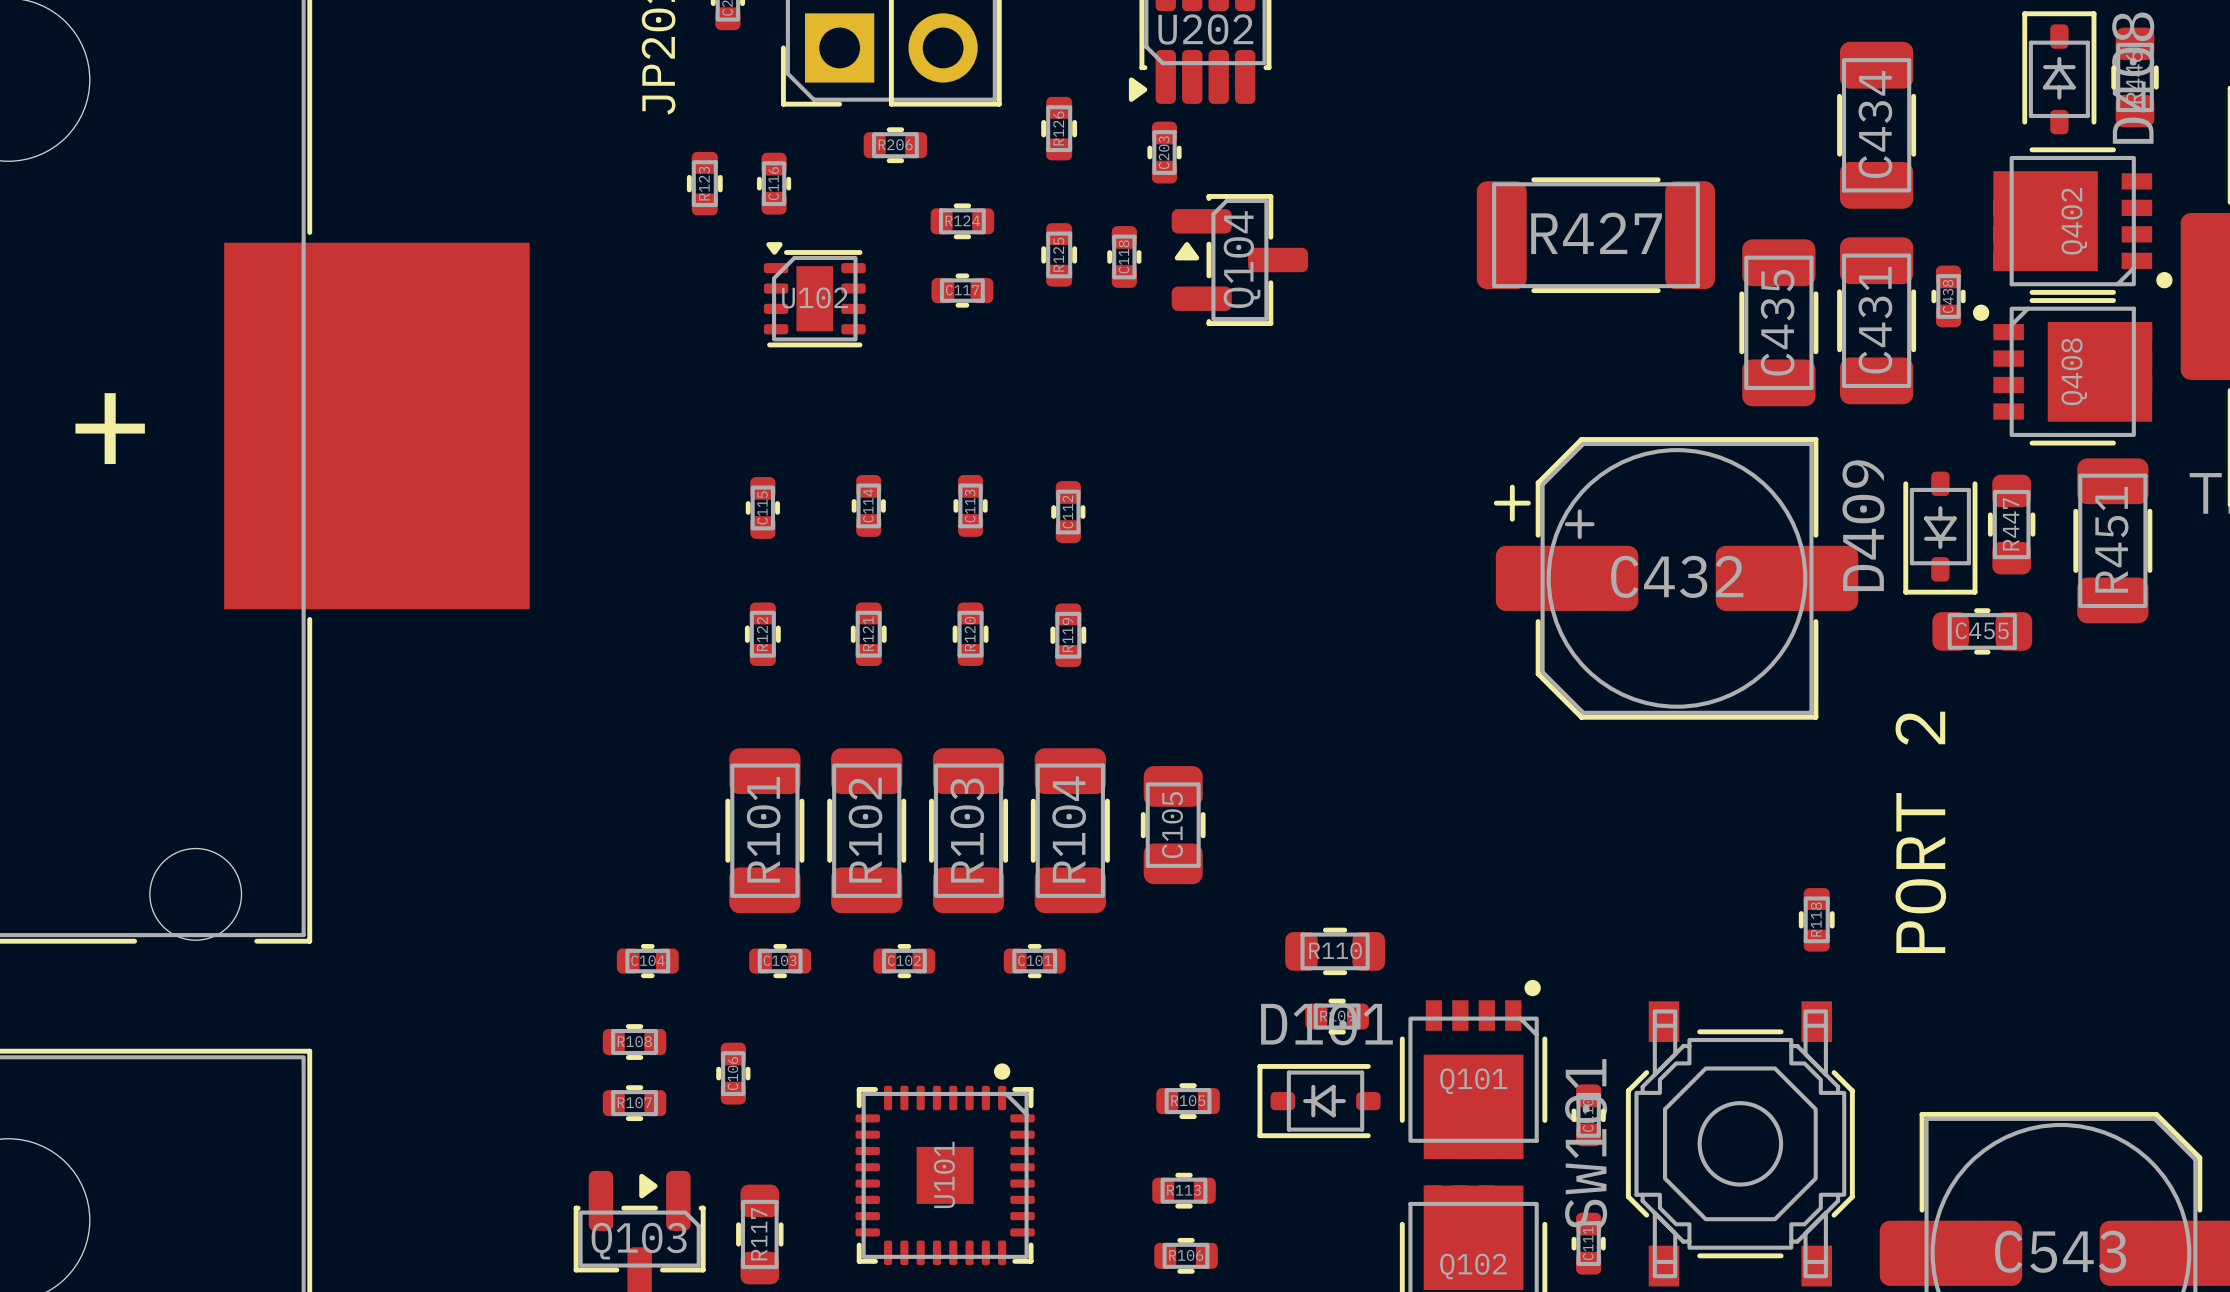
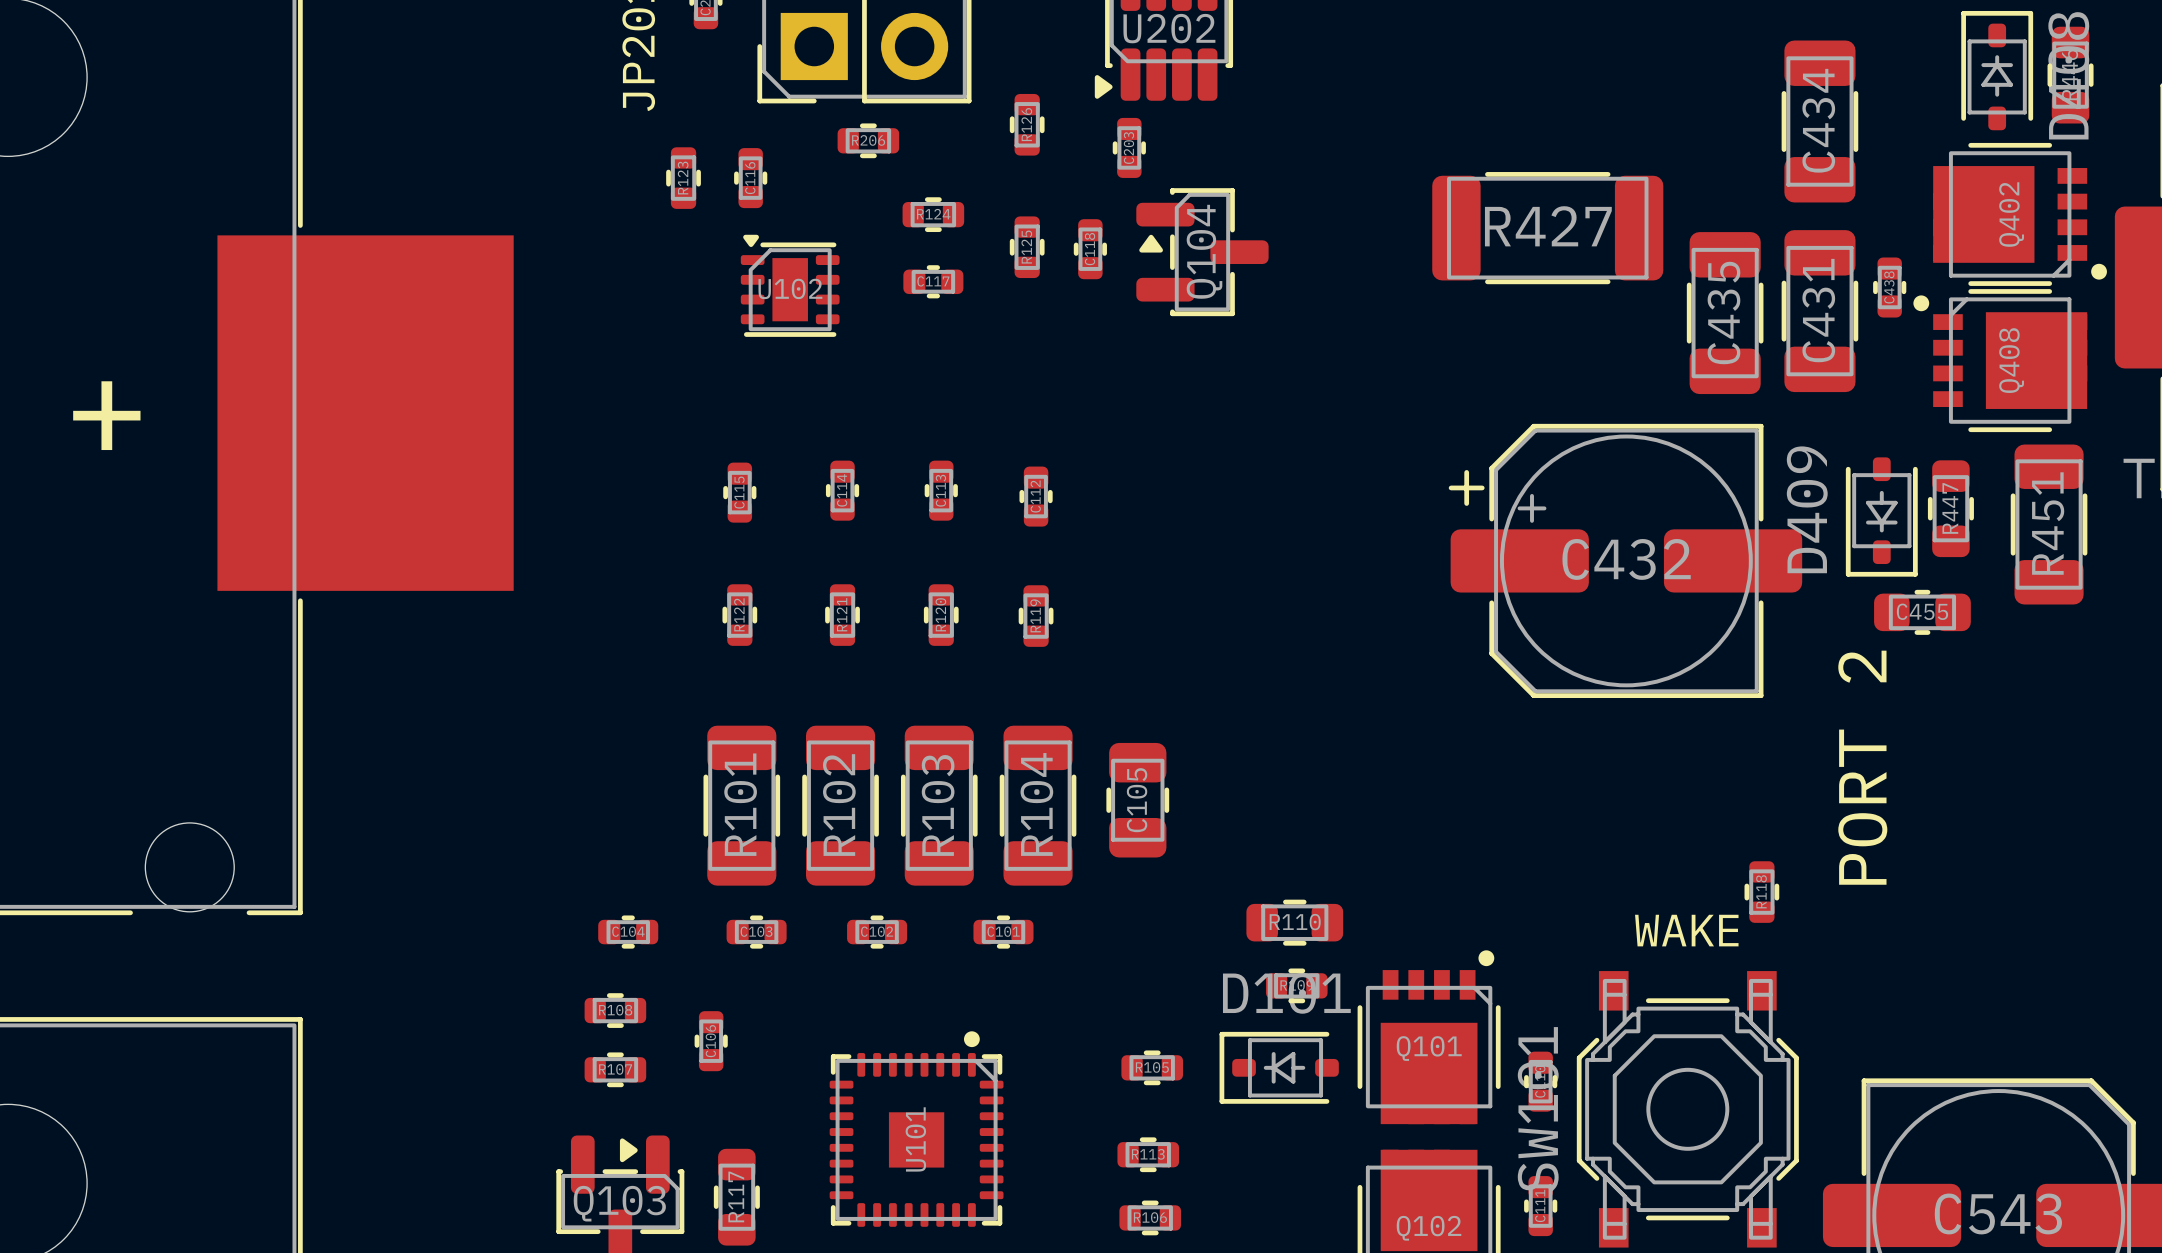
text position: PORT 2 (1920, 832) -> PORT 2 (1862, 767)
text: none -> WAKE (1686, 930)

